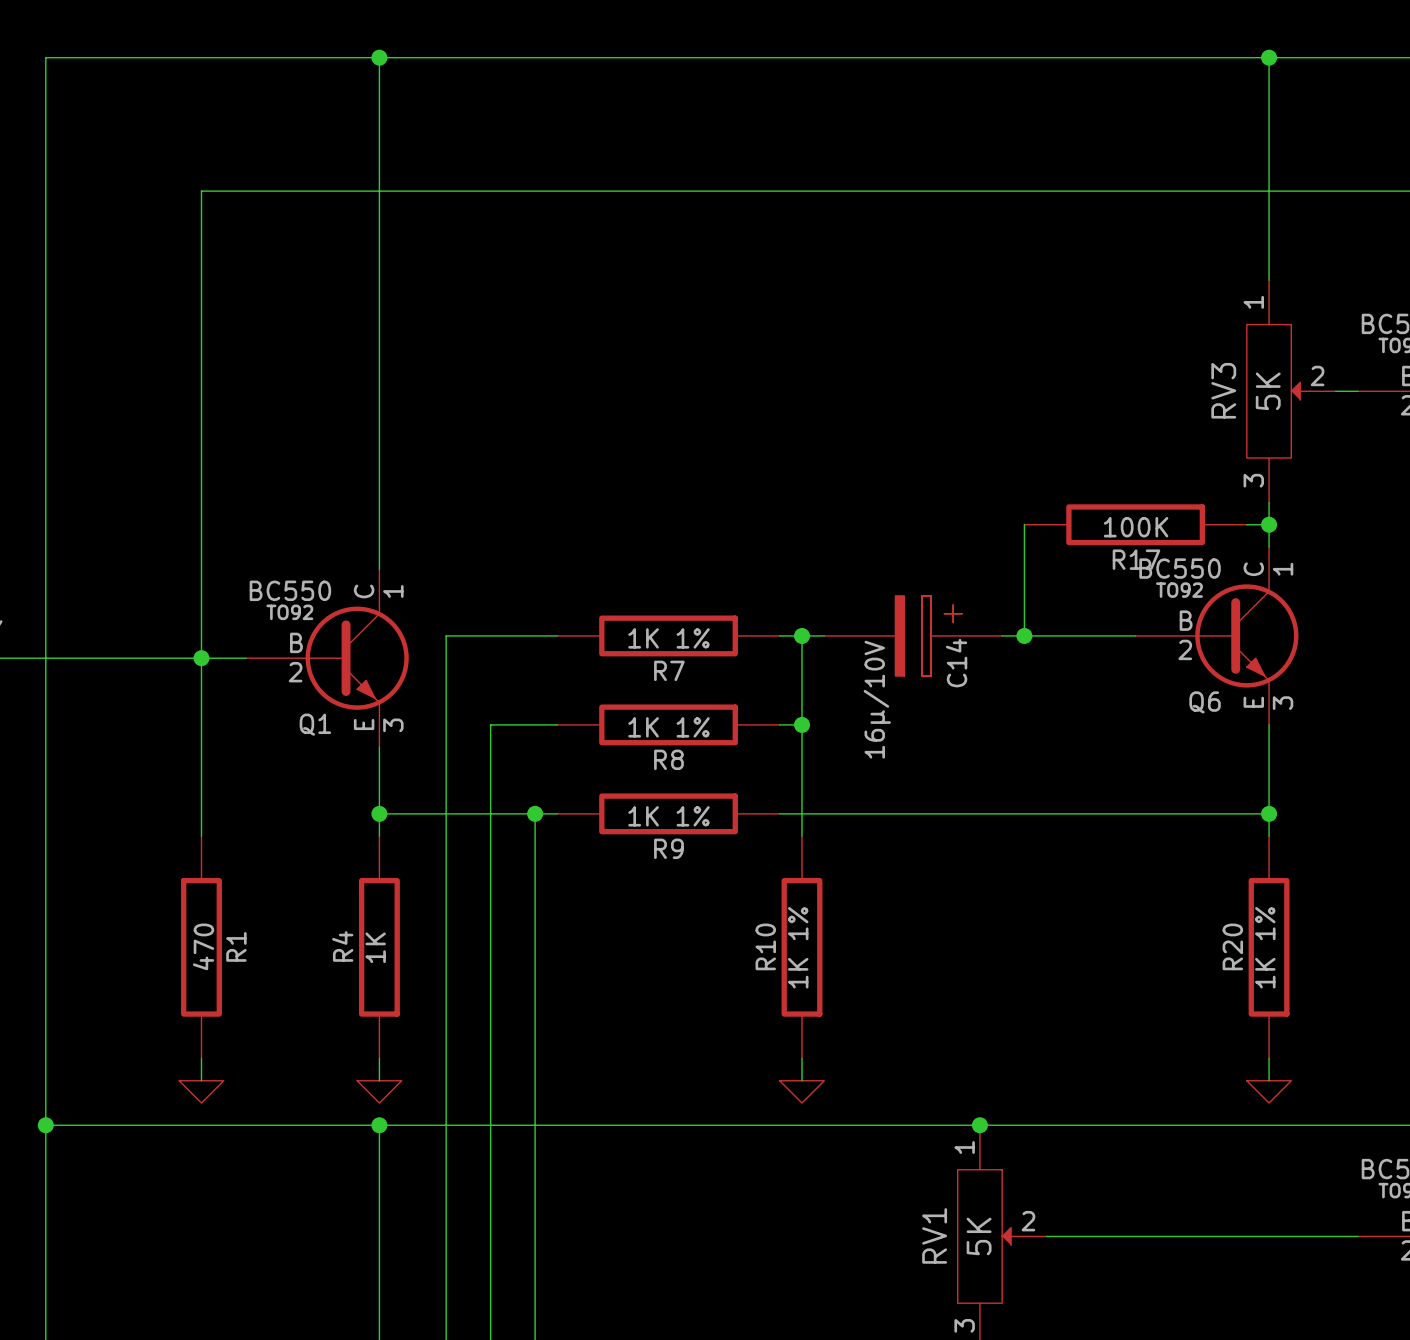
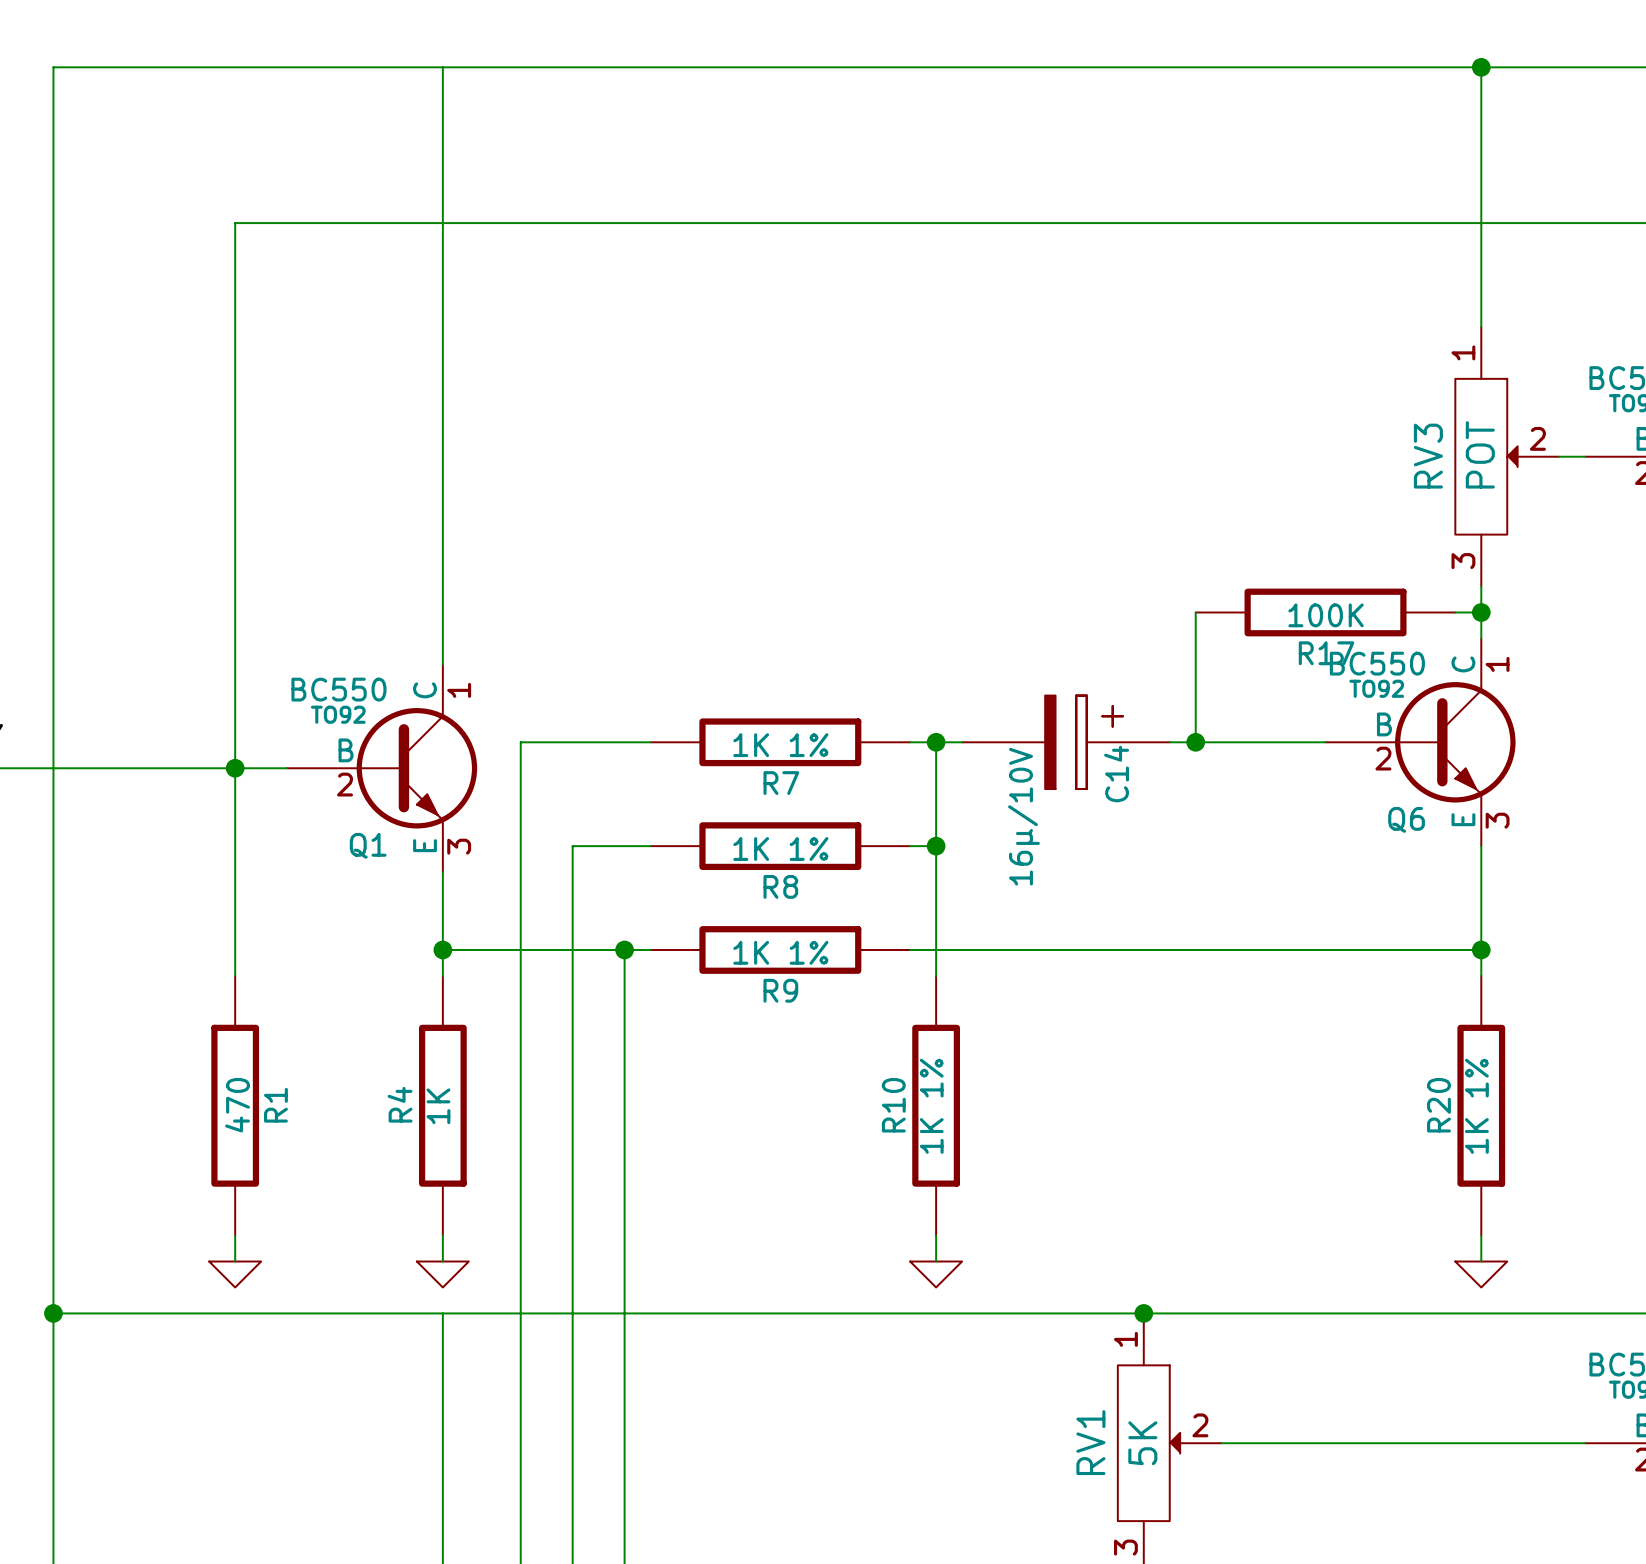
junction: (379, 57) -> none
RV3 value: 5K (1268, 391) -> POT (1480, 454)
junction: (379, 1125) -> none

